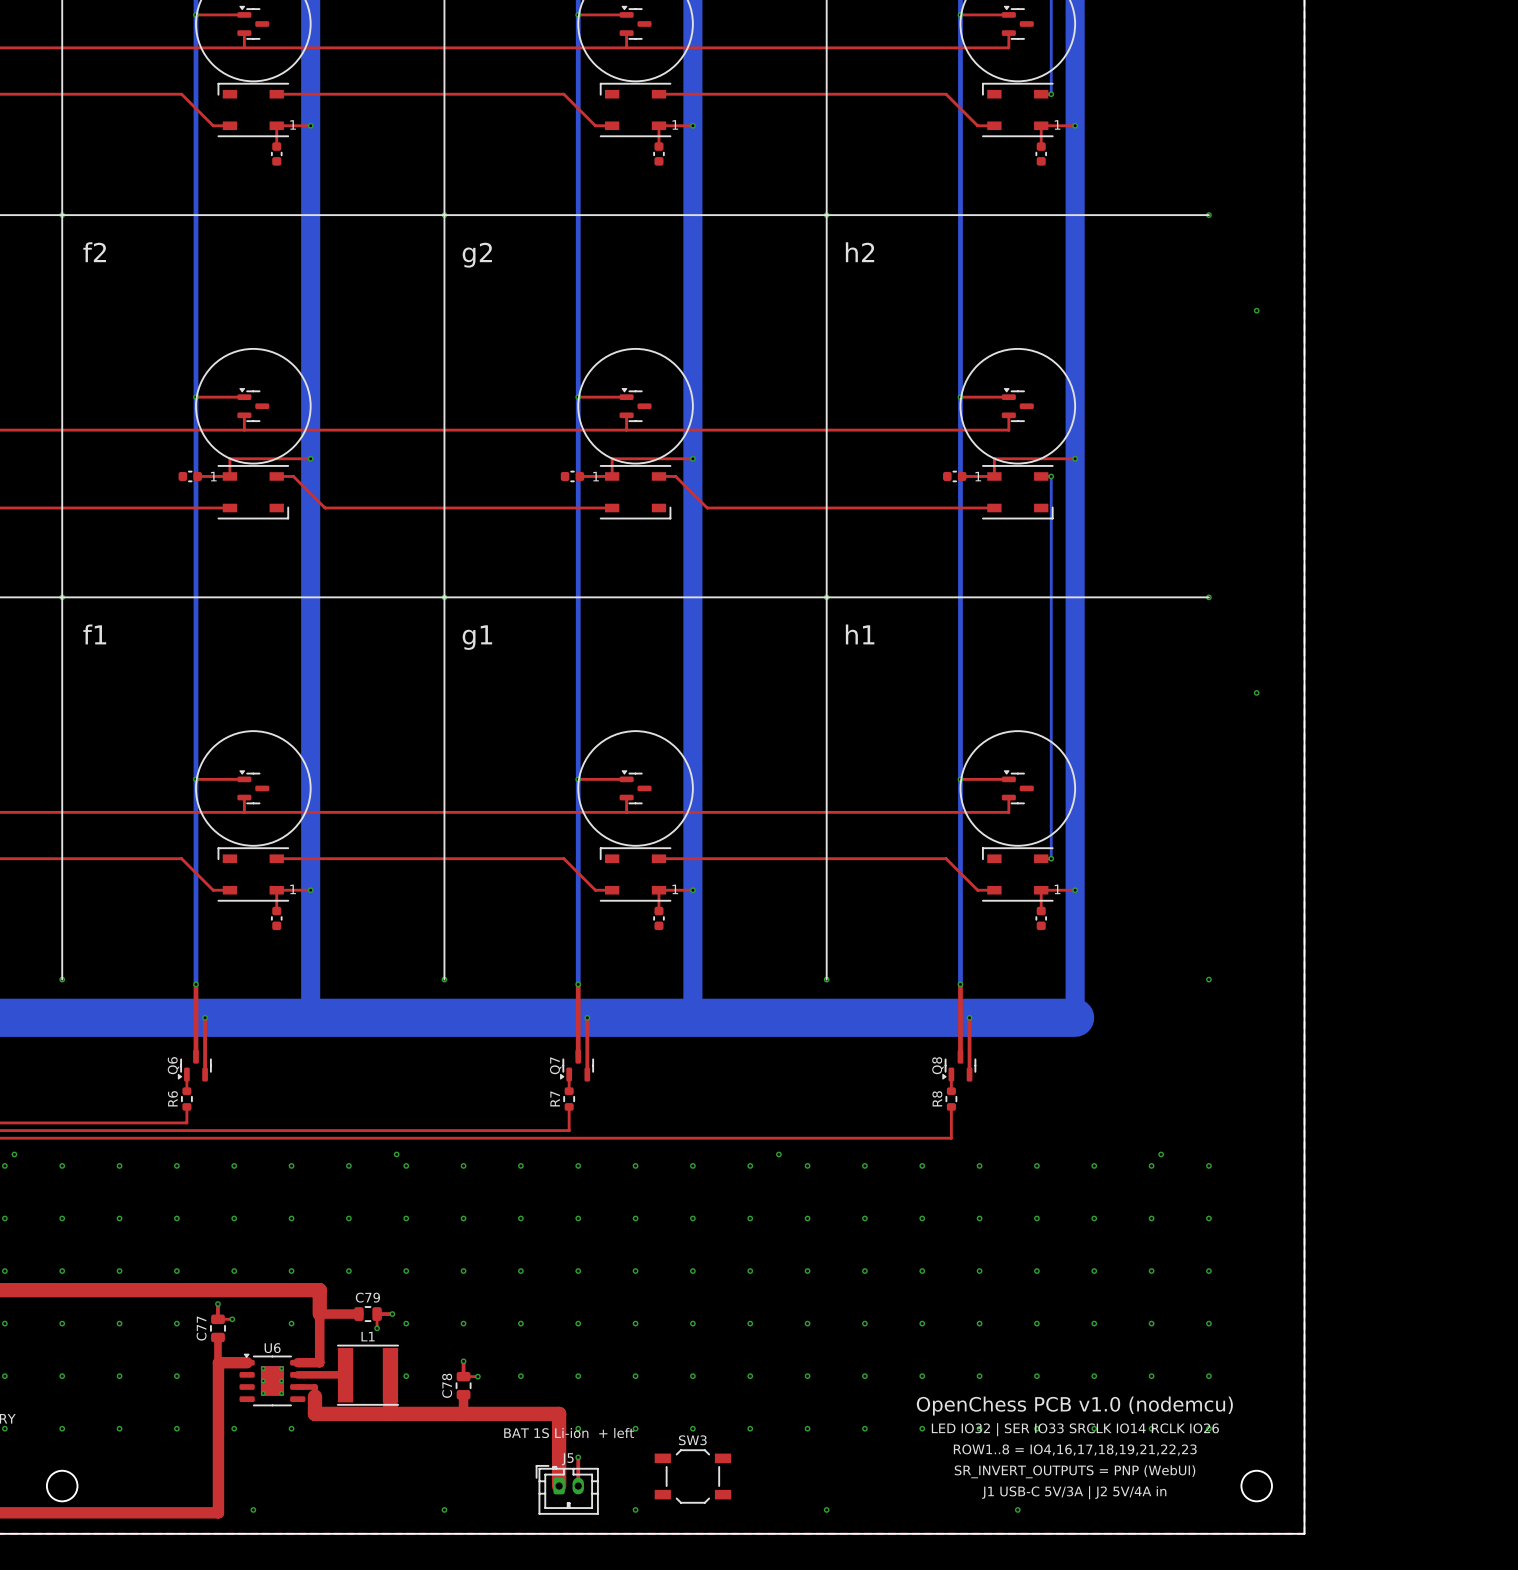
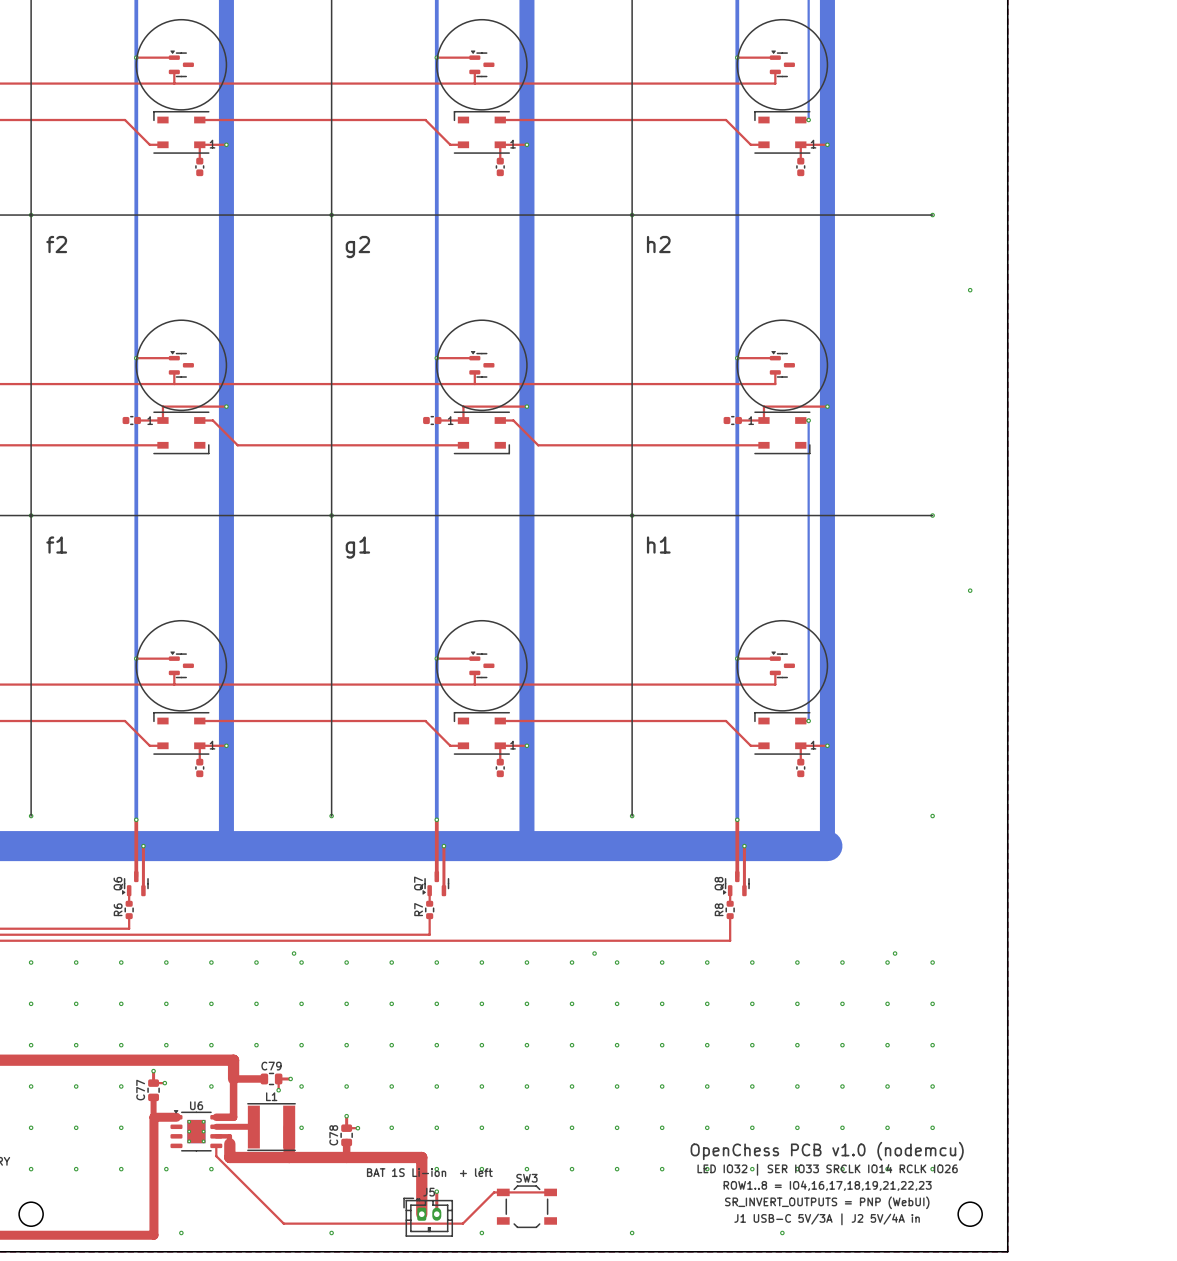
top track: none -> (216, 1145) (216, 1156) (283, 1223) (462, 1223) (494, 1192) (550, 1192)

